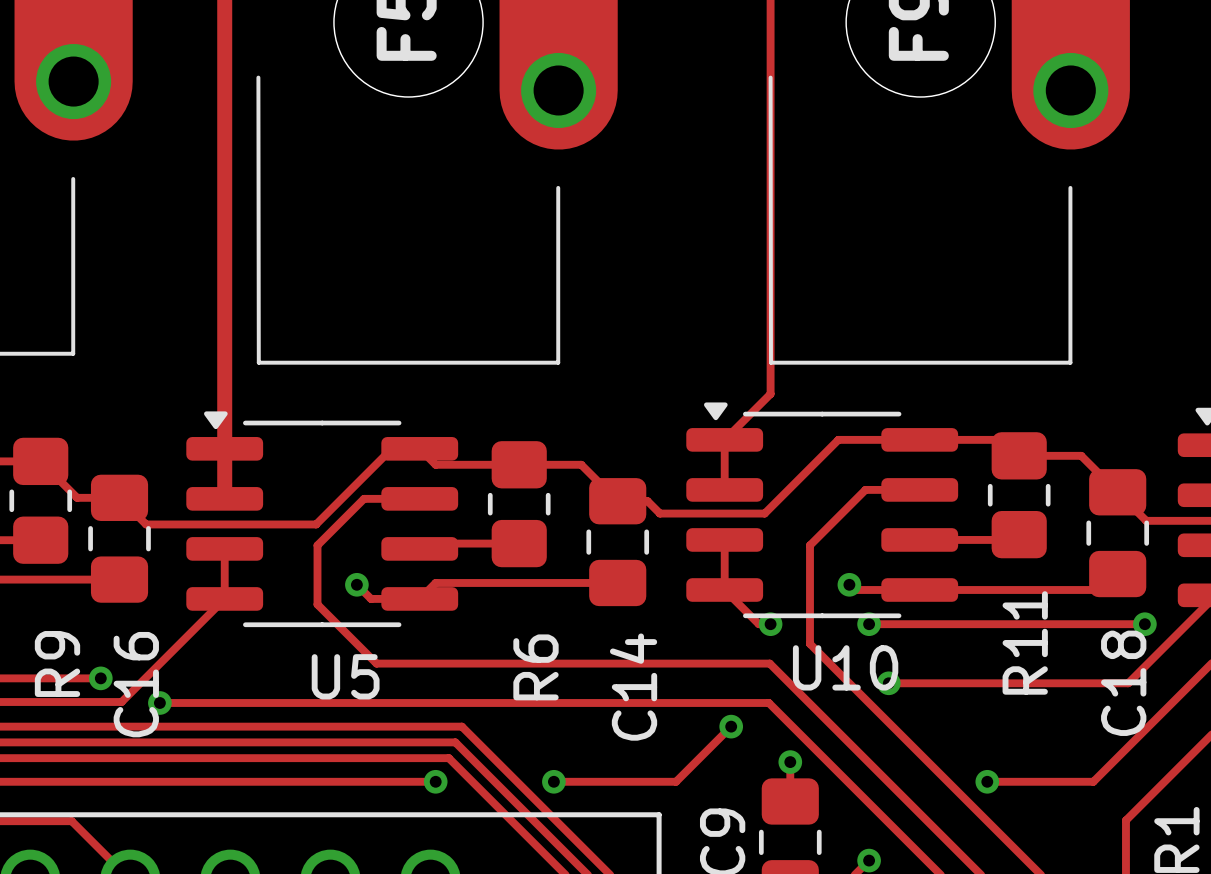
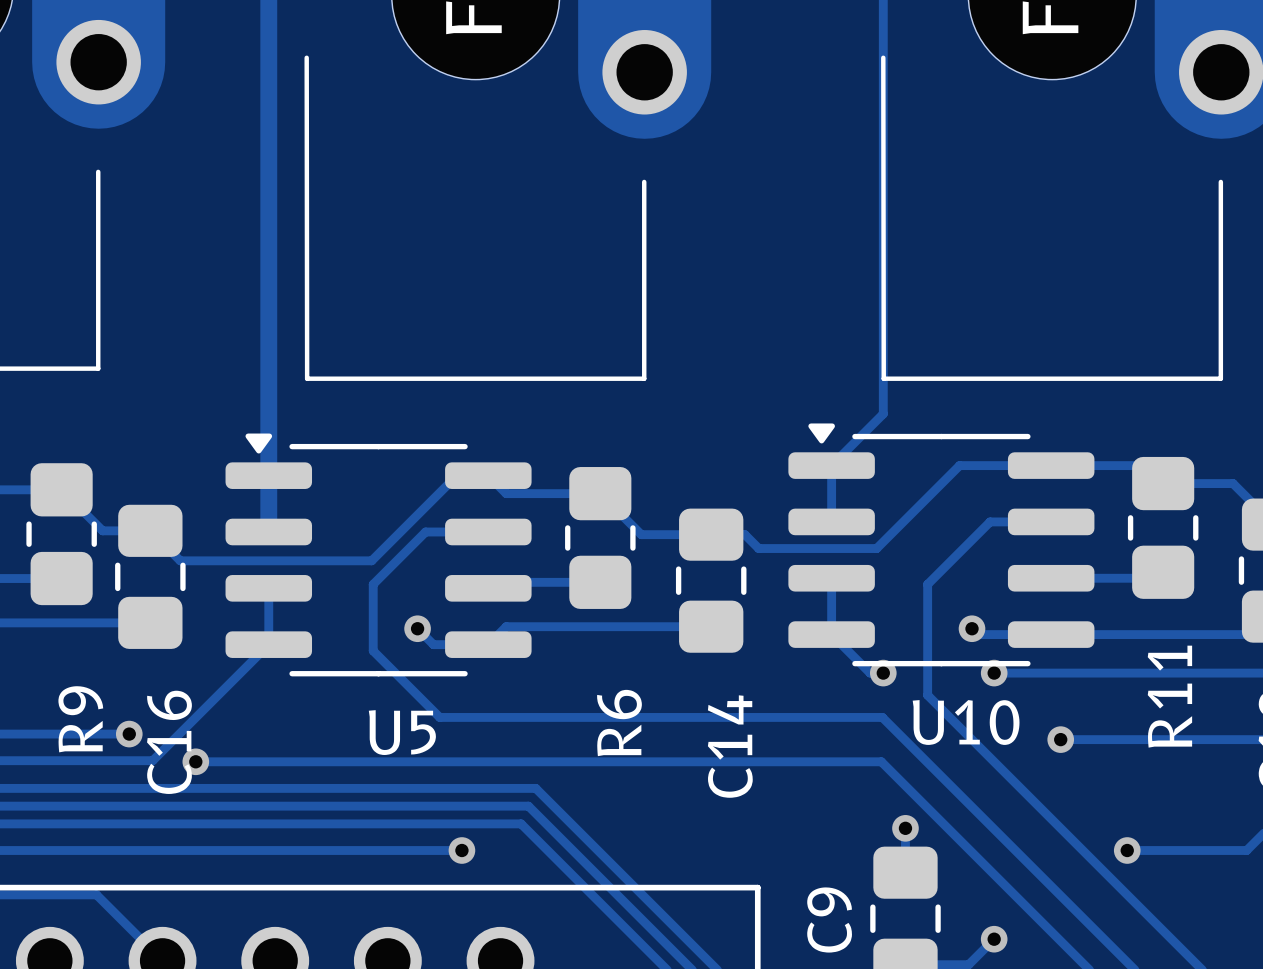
track: (519, 464) (581, 464) (617, 501) -> (600, 493) (641, 534) (711, 534)
track: (888, 683) (928, 683) -> none
via position: (888, 683) -> (1060, 739)
track: (731, 726) (676, 781) (553, 781) -> none
via: (731, 726) -> none
track: (396, 781) (435, 781) -> none
via position: (435, 781) -> (461, 850)
via: (553, 781) -> none

